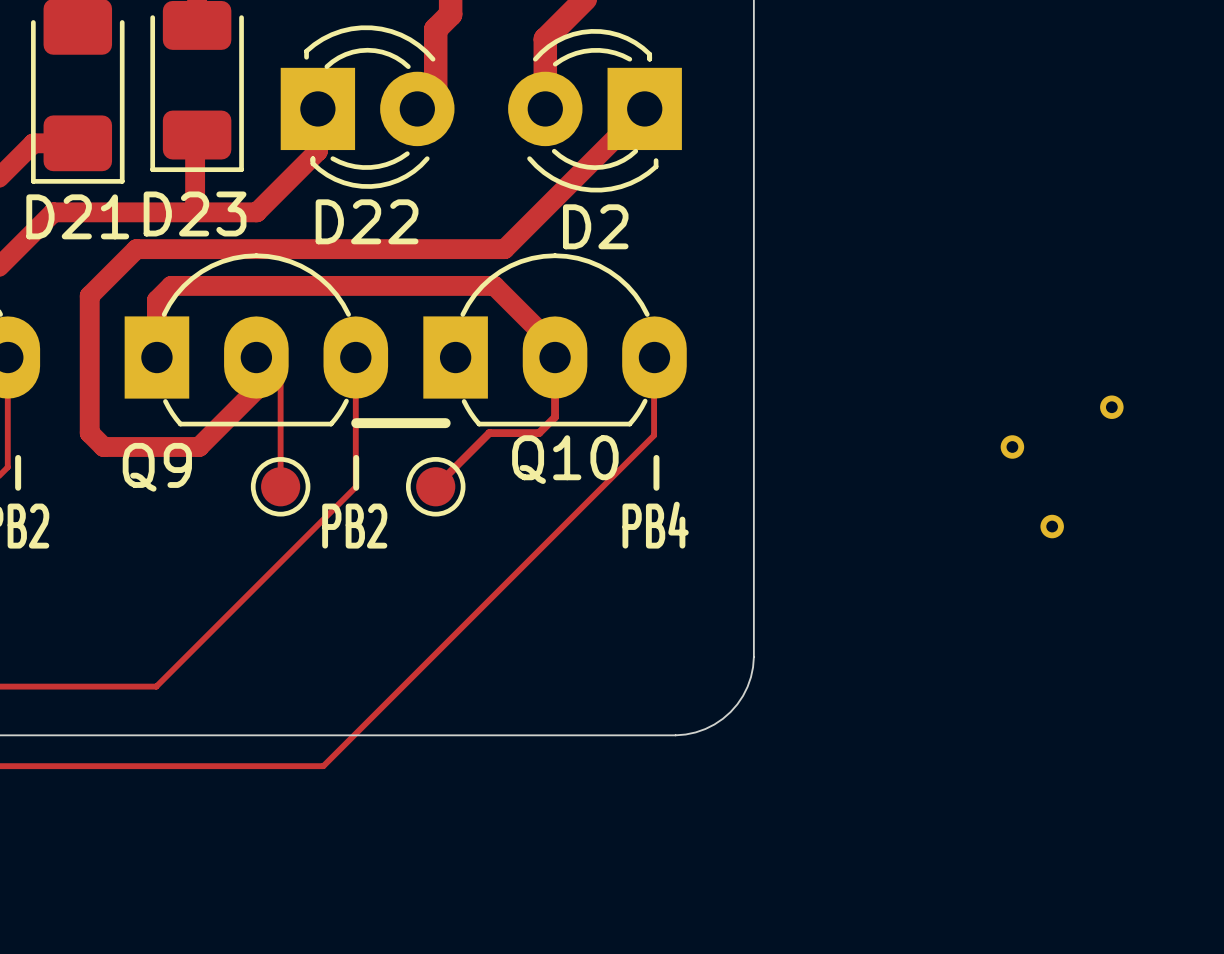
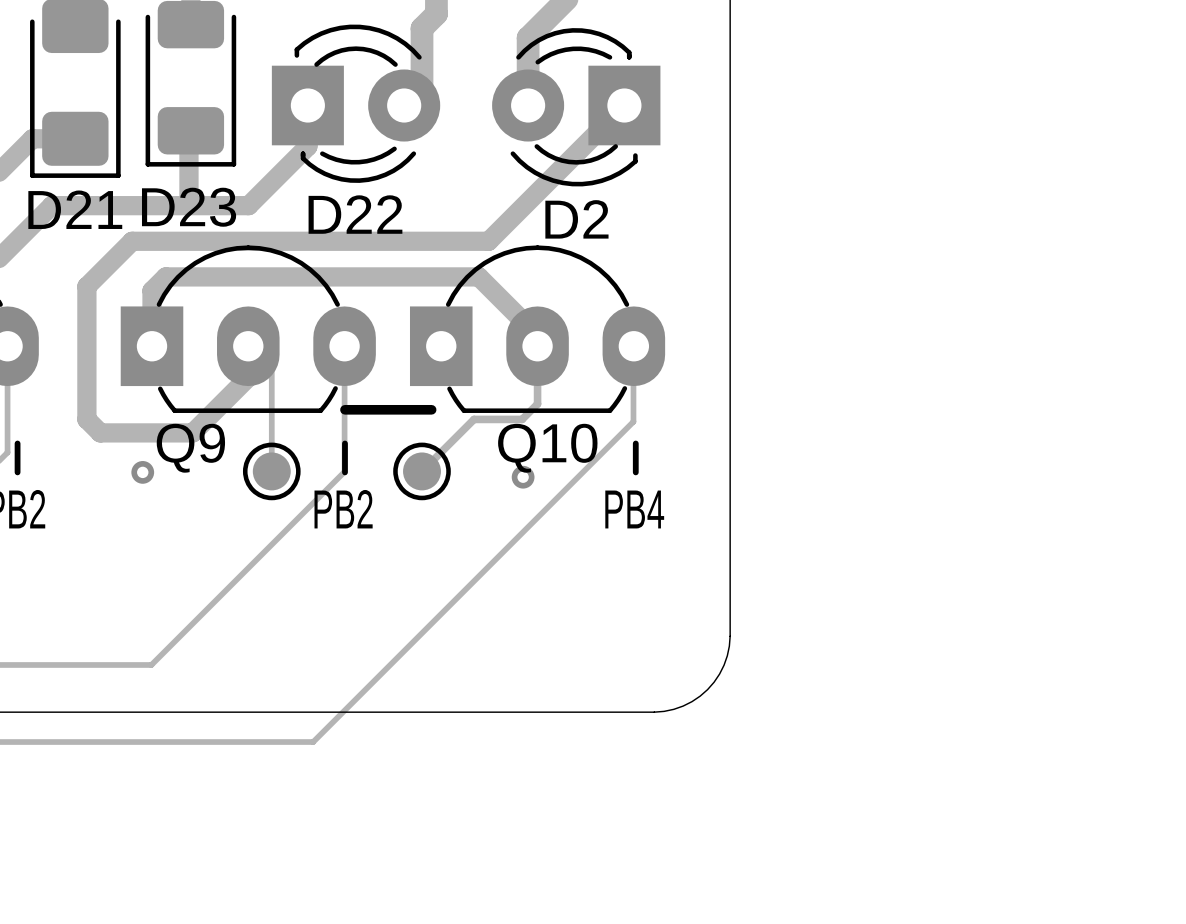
part: (1111, 407) -> none
part: (1012, 446) -> none
Q9 name position: Q9 (157, 467) -> Q9 (190, 448)
part: none -> (142, 472)
part: none -> (523, 477)
part: (1052, 526) -> none

